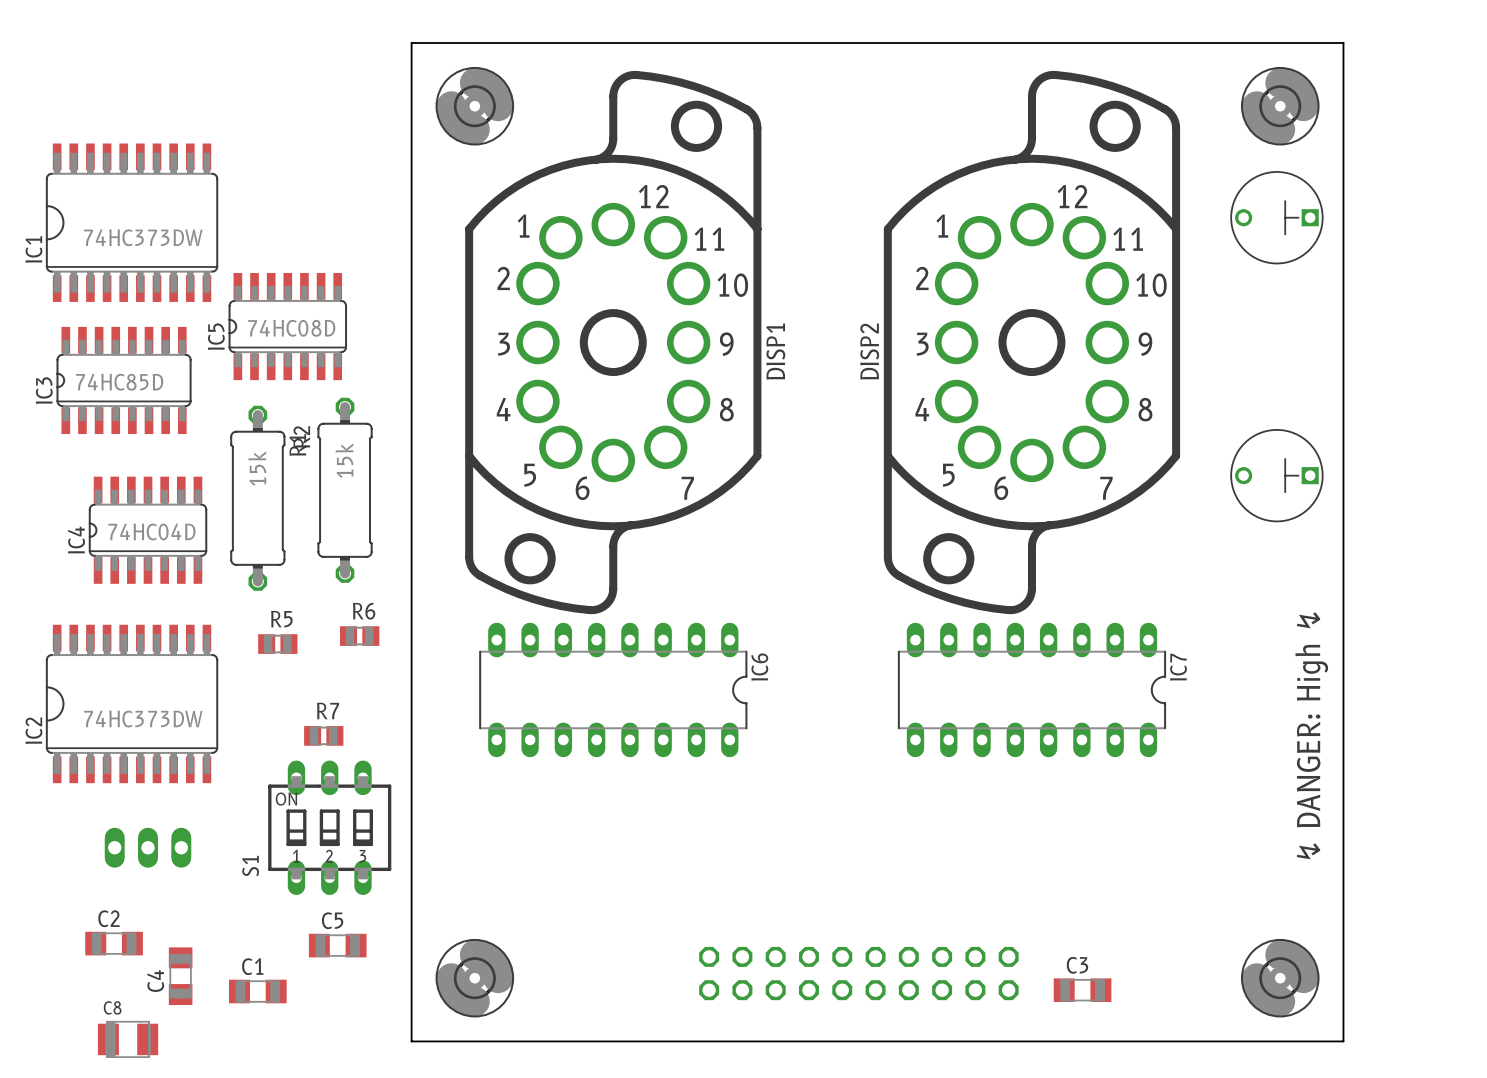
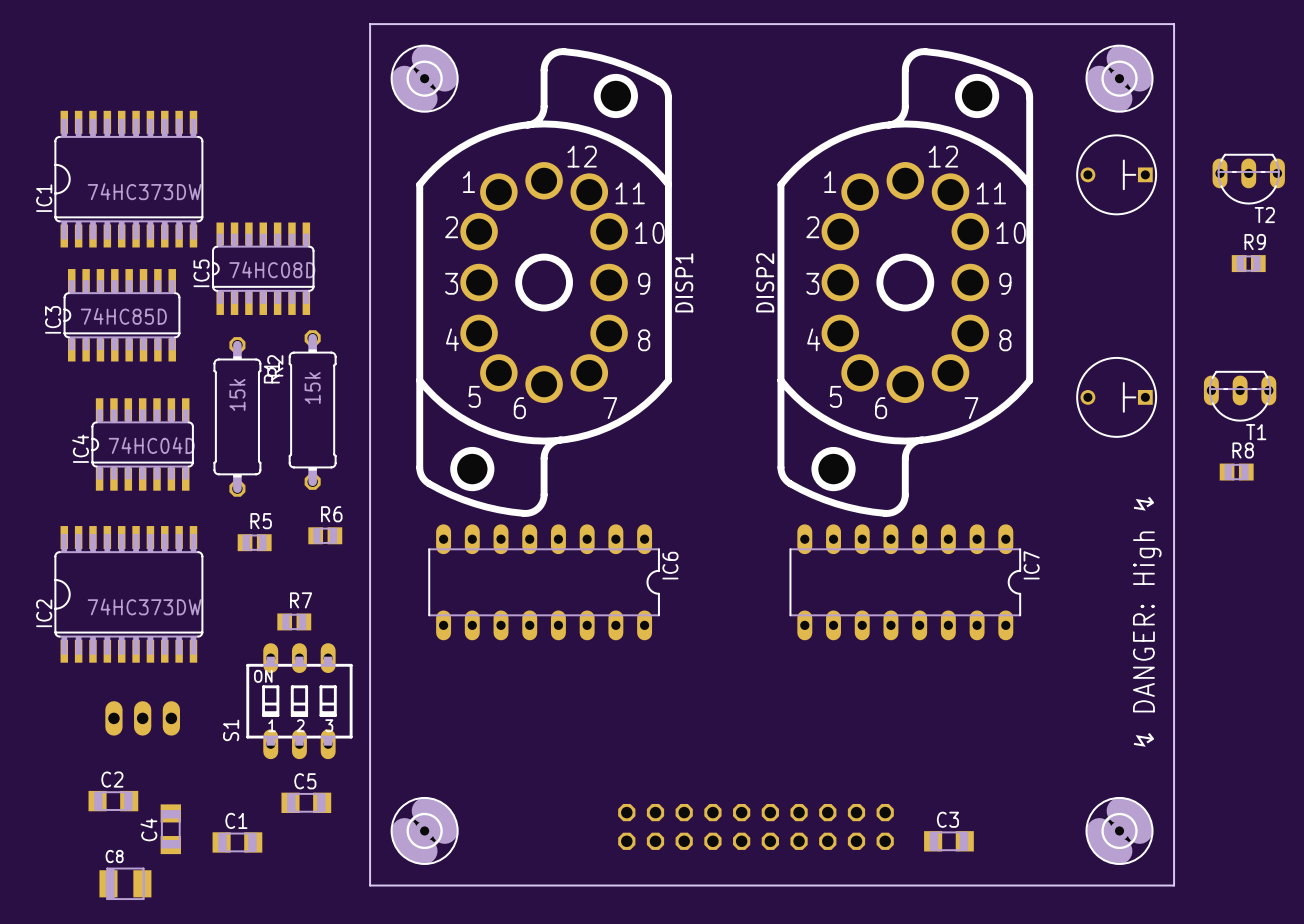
T2: none -> (1248, 179)
R9: none -> (1248, 263)
T1: none -> (1240, 396)
R8: none -> (1236, 472)

